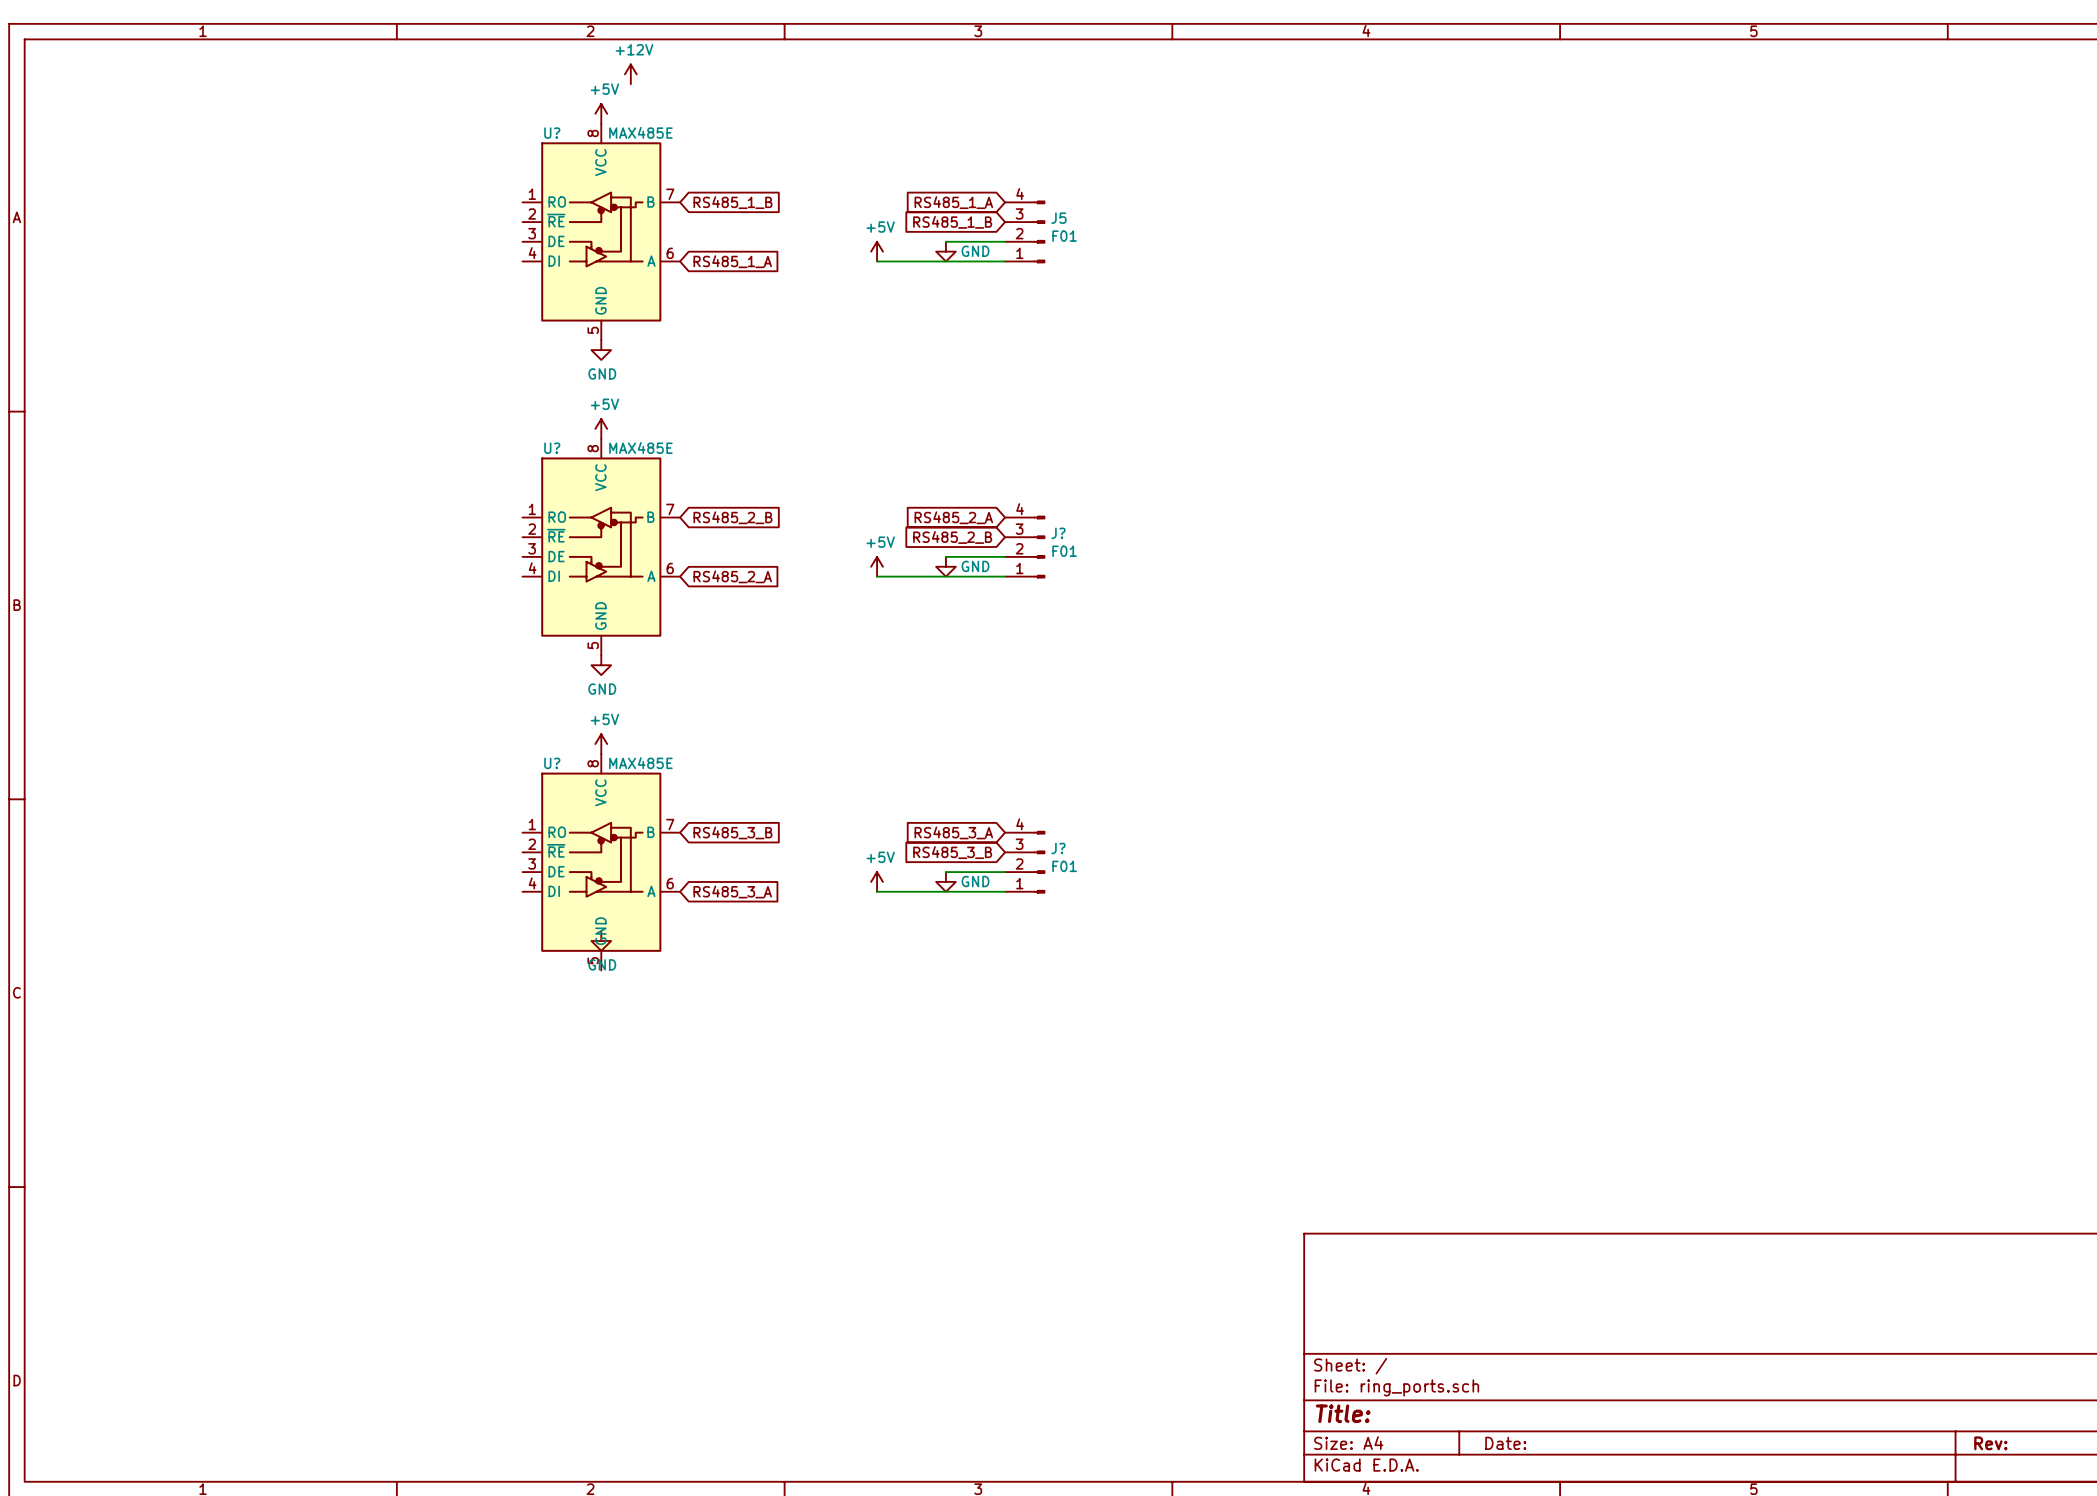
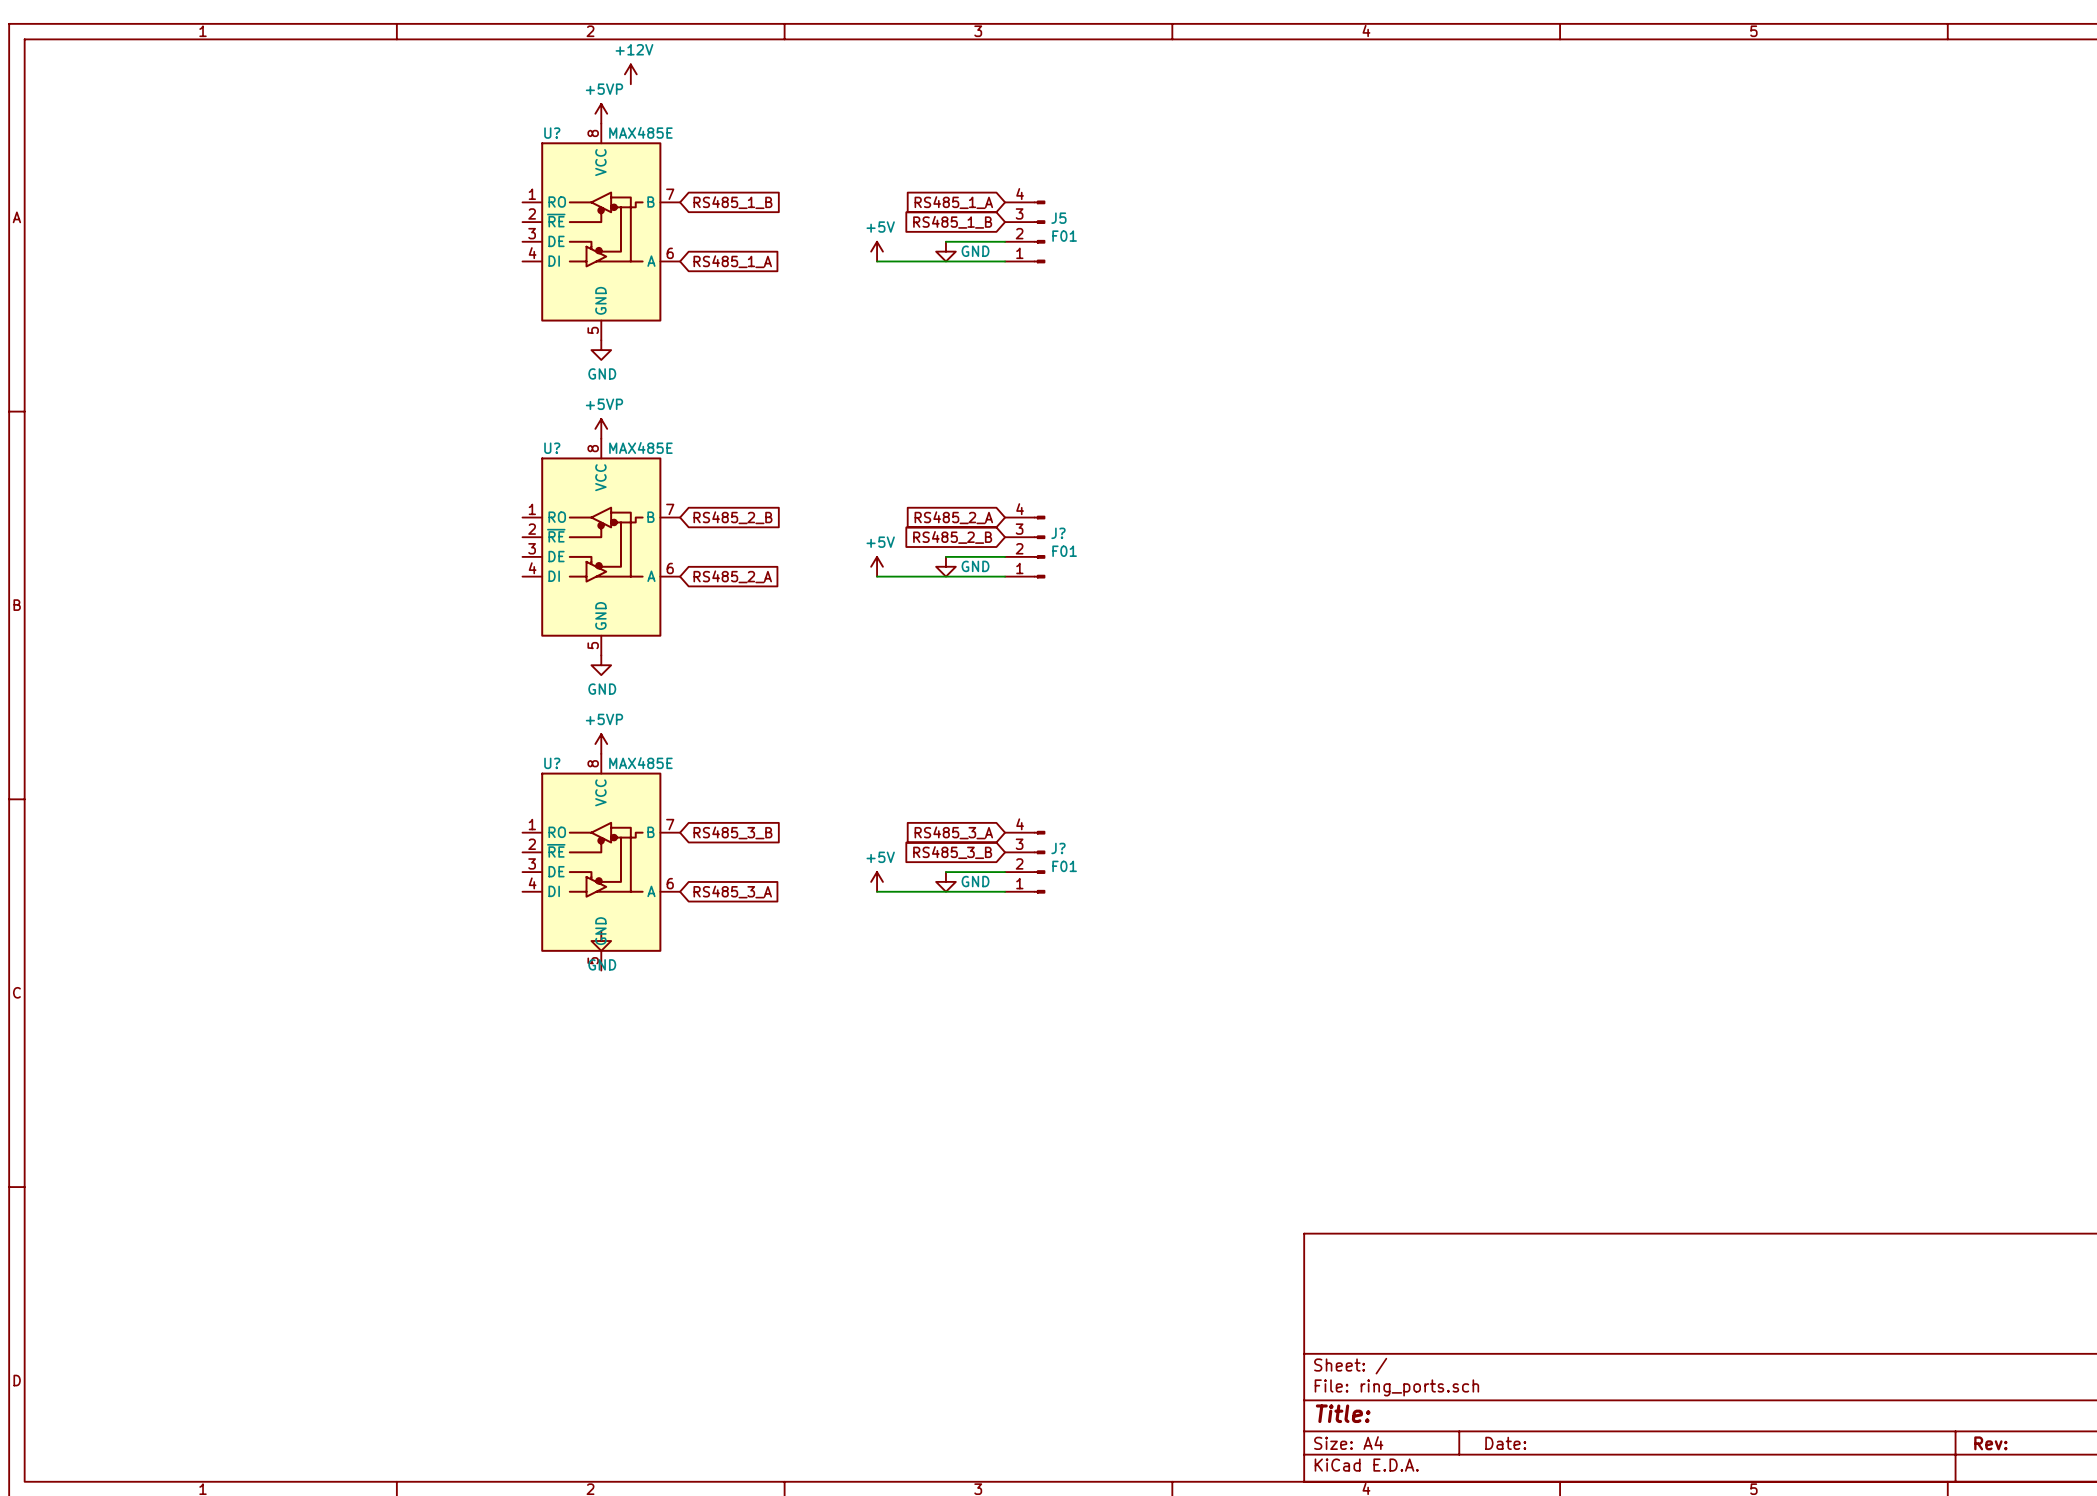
power symbol: +5V (601, 113) -> +5VP (601, 113)
power symbol: +5V (601, 428) -> +5VP (601, 428)
power symbol: +5V (601, 744) -> +5VP (601, 744)

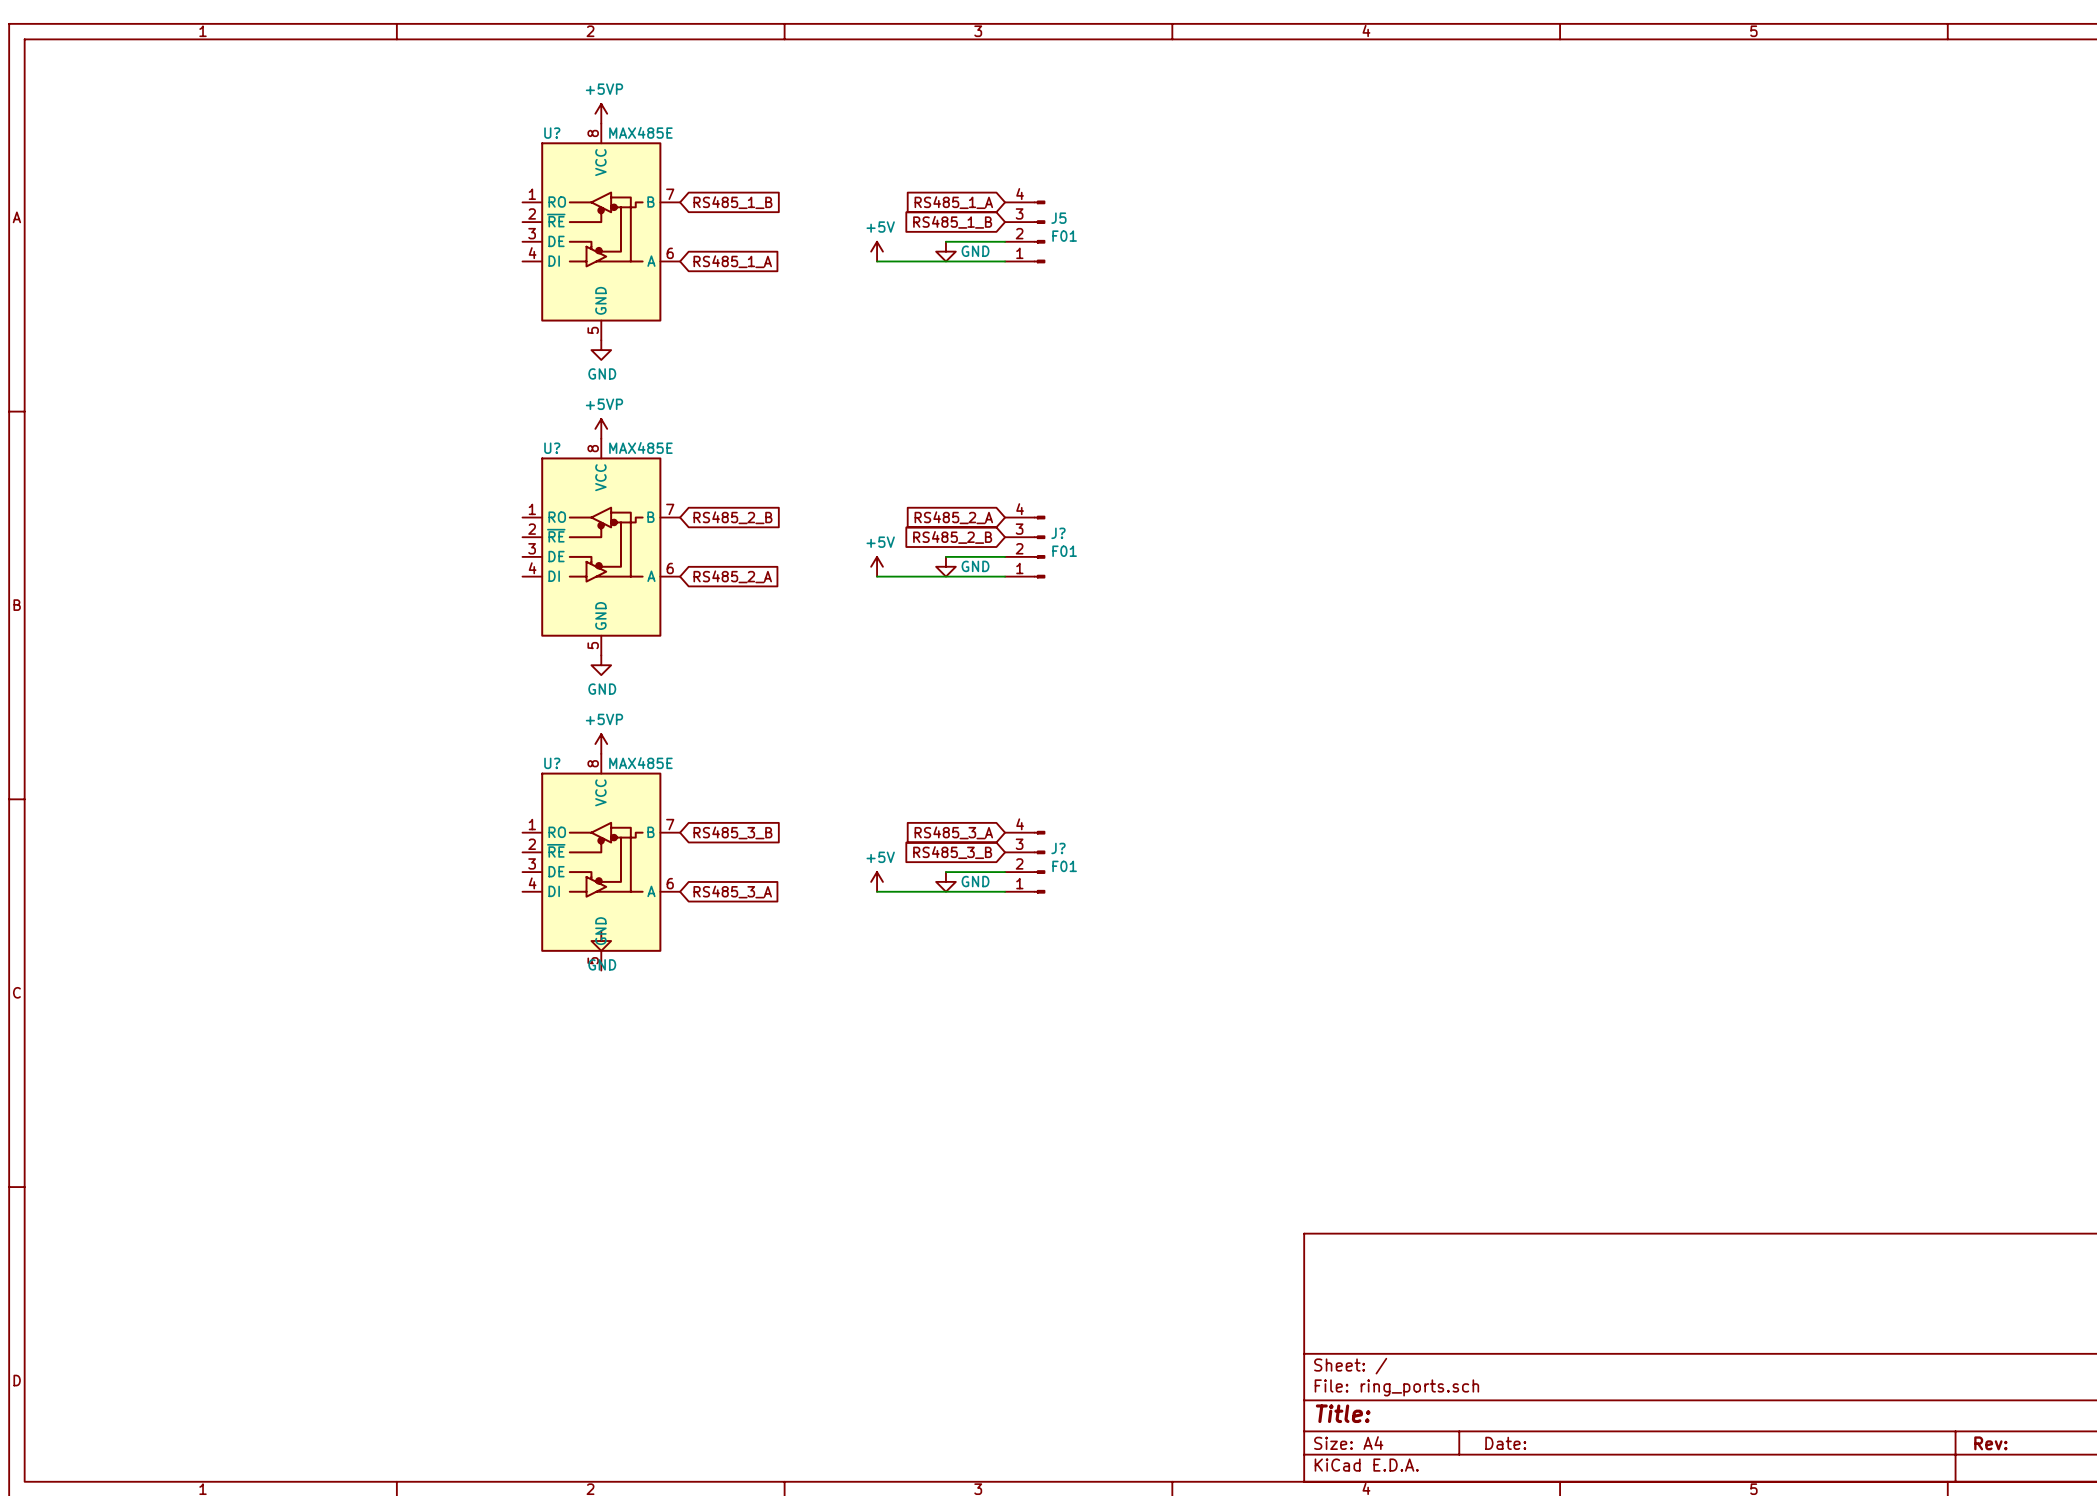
power symbol: +12V (630, 74) -> none

